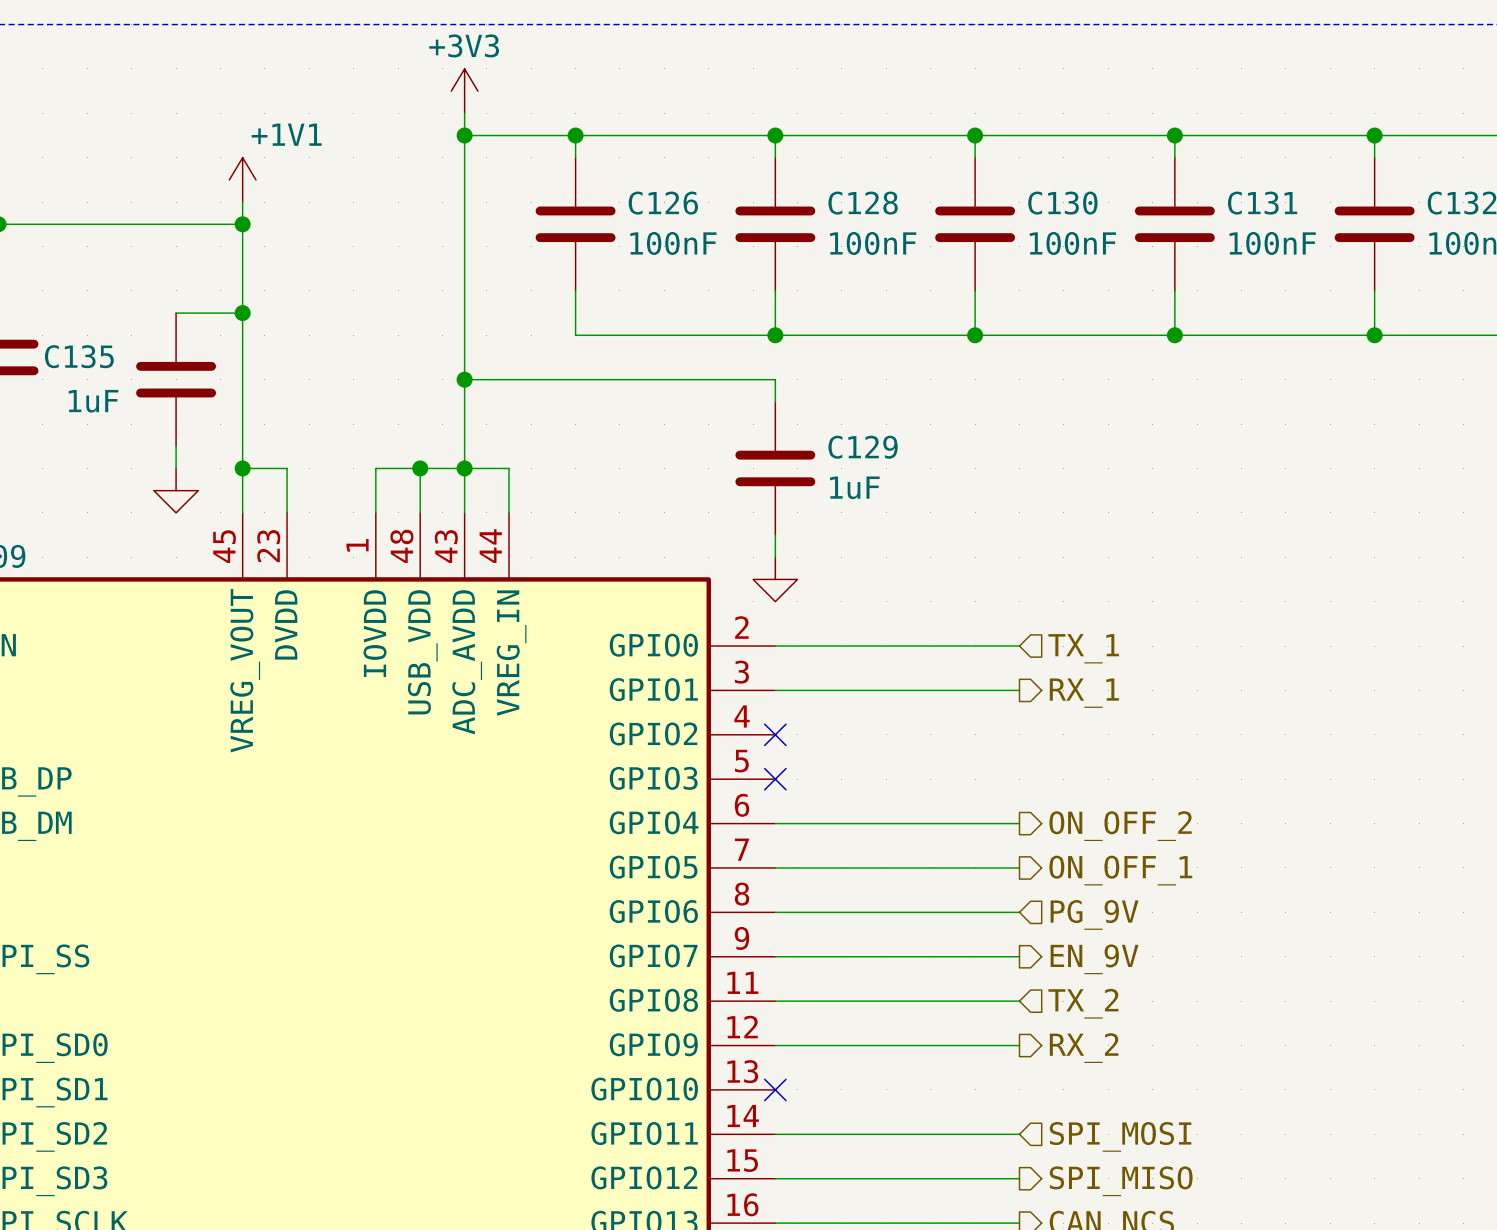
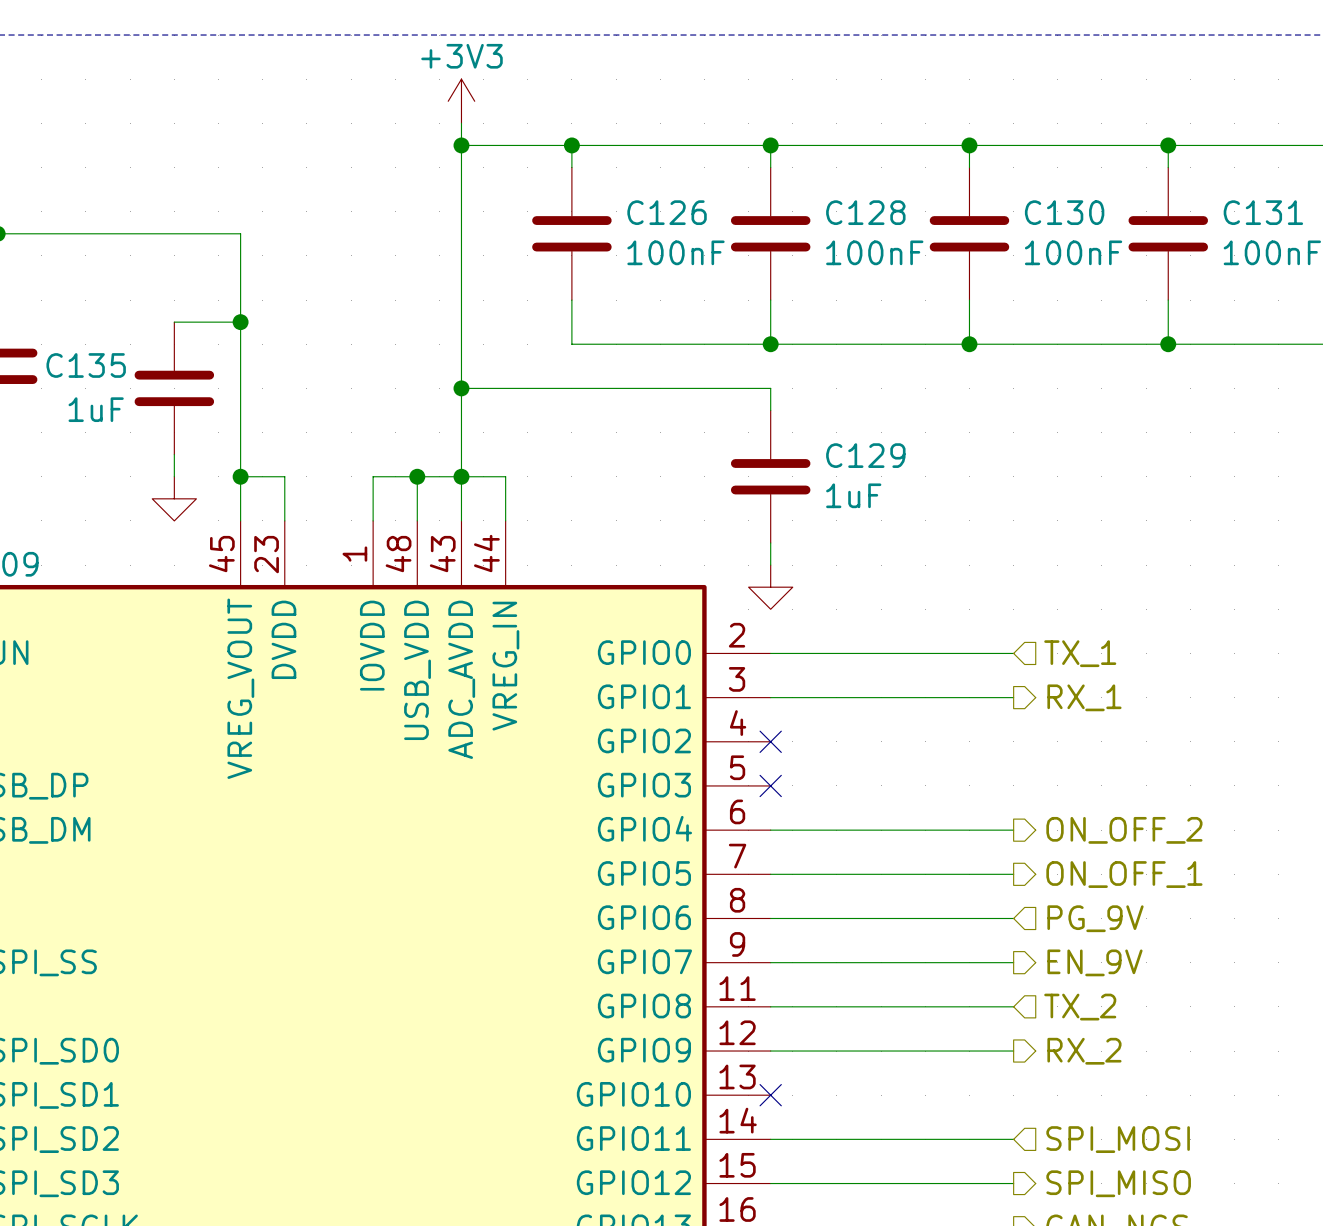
power symbol: +1V1 (242, 179) -> none
wire: (242, 202) (242, 224) -> none
junction: (242, 224) -> none

